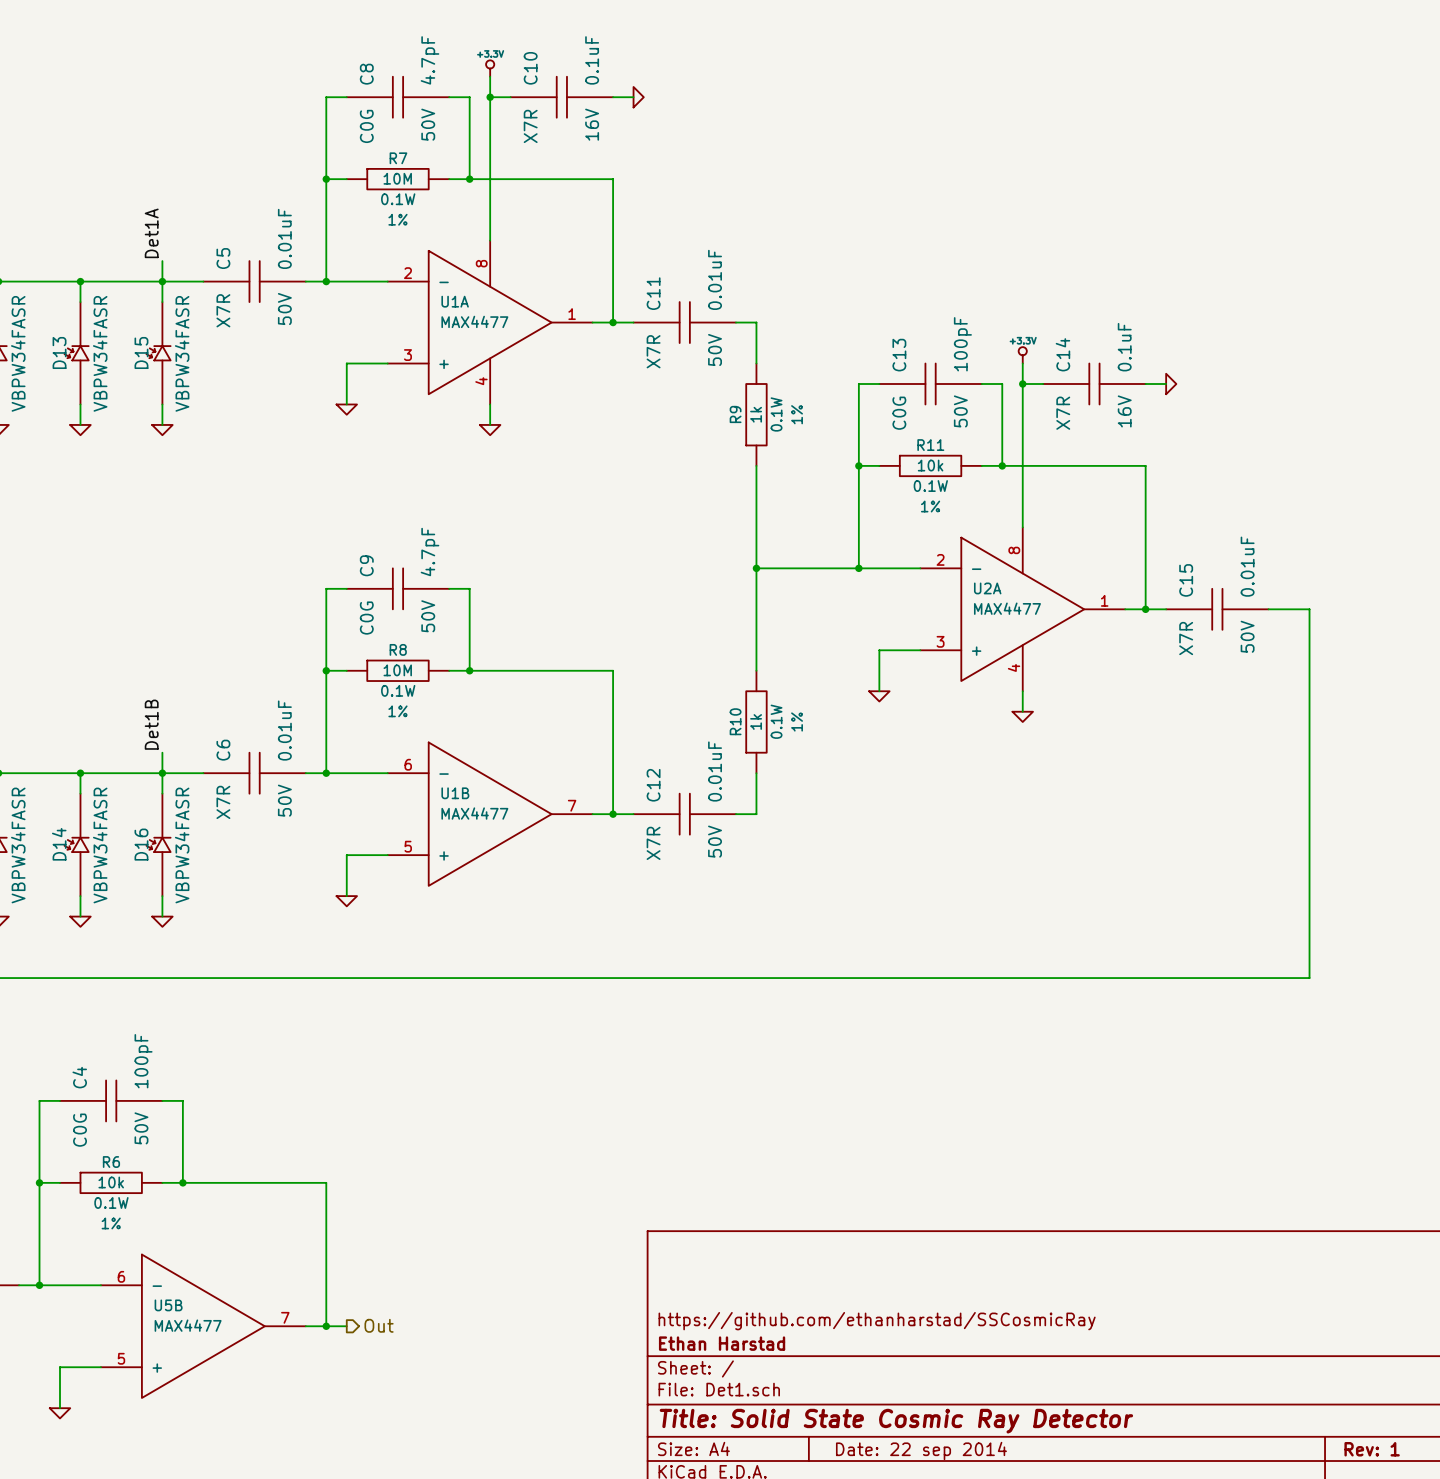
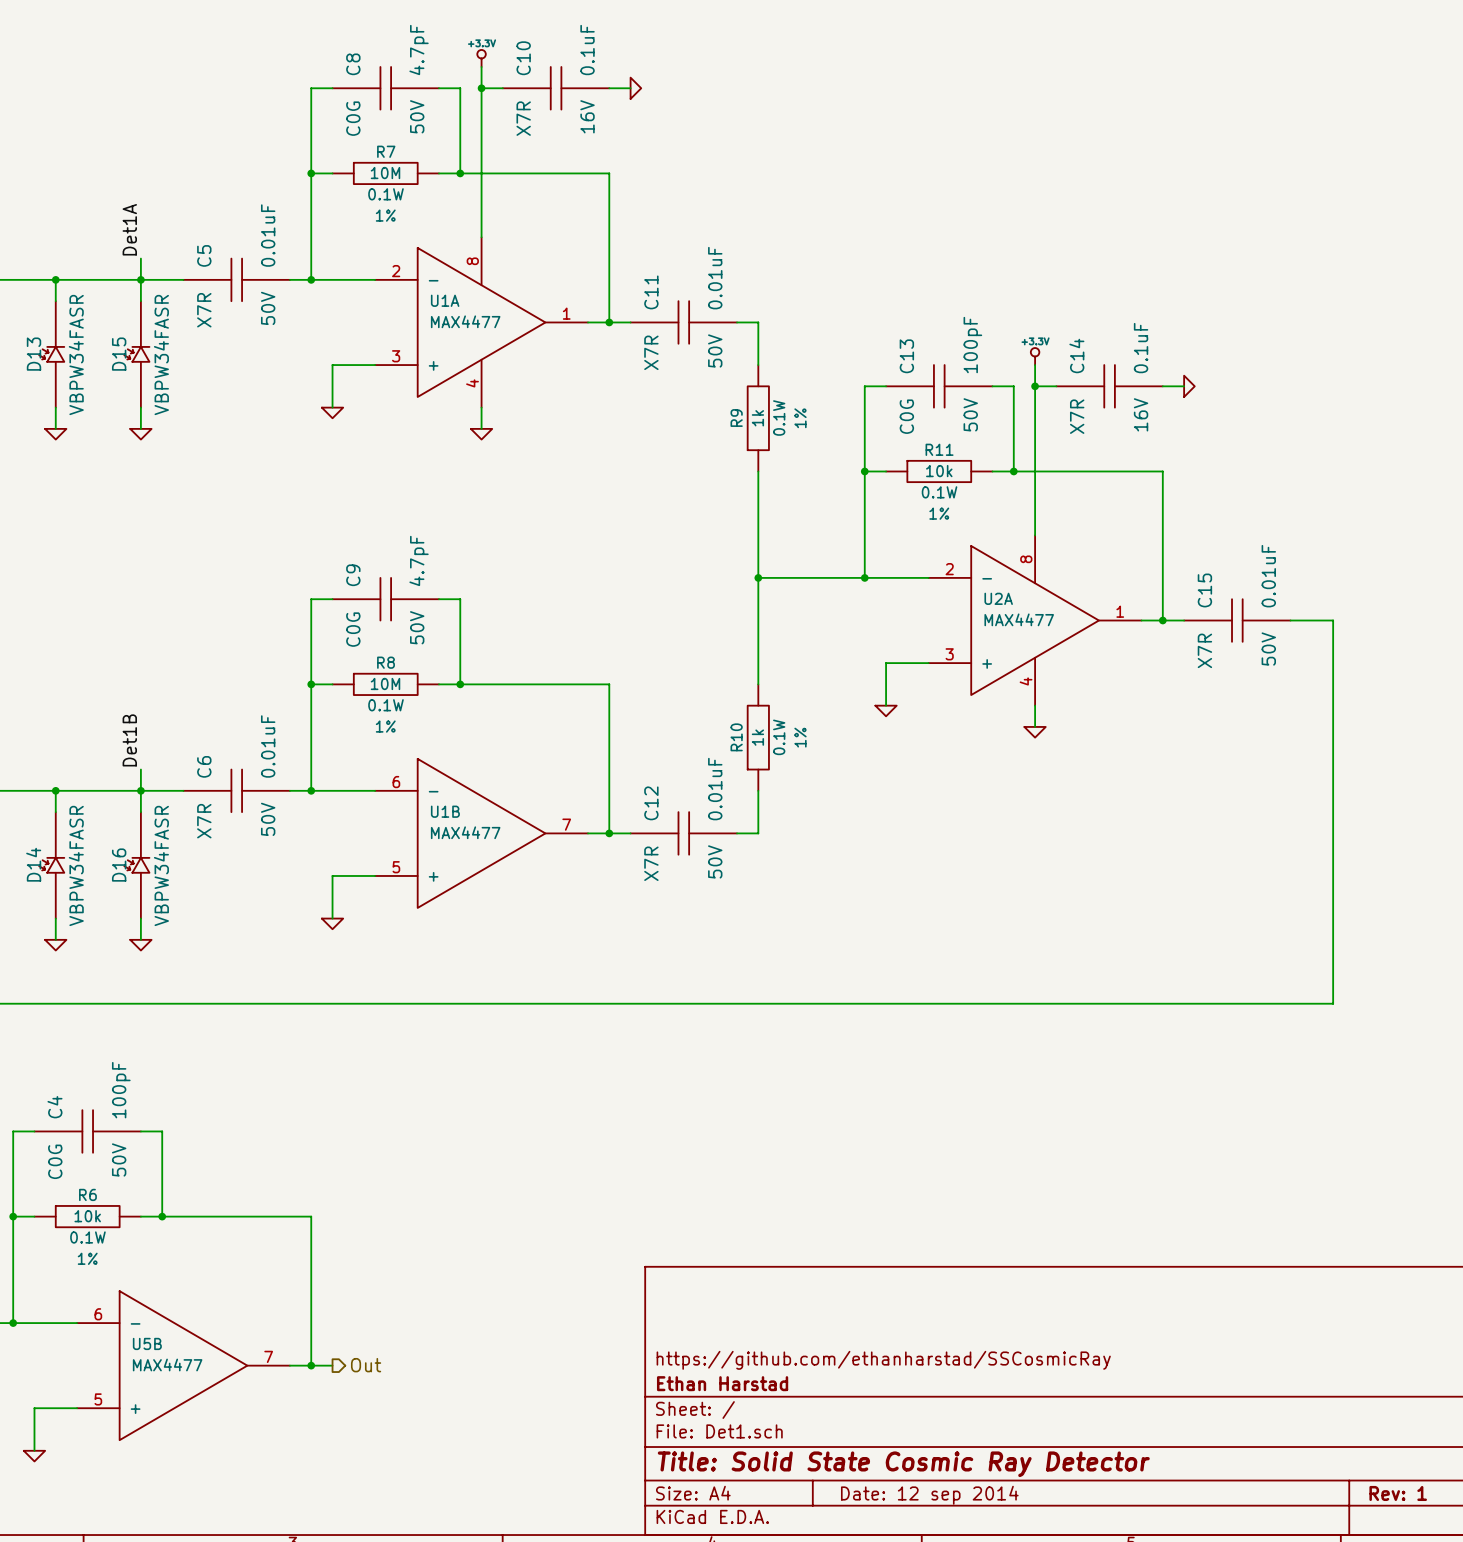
title block: Date: 22 sep 2014 (921, 1450) -> Date: 12 sep 2014 (929, 1495)

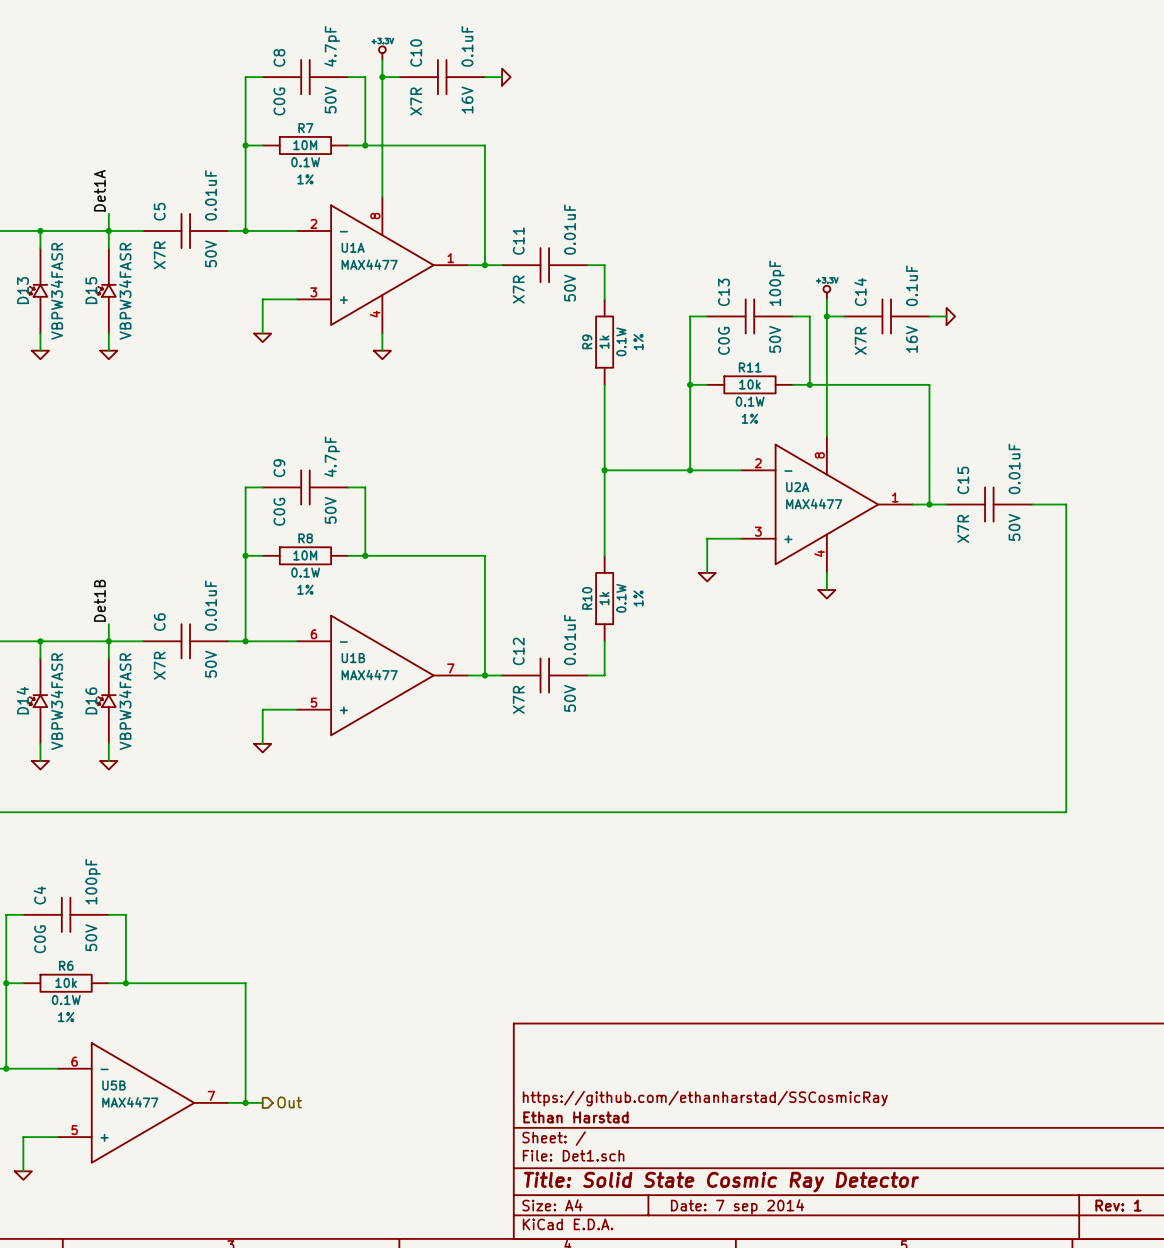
title block: Date: 12 sep 2014 (929, 1495) -> Date: 7 sep 2014 (737, 1207)

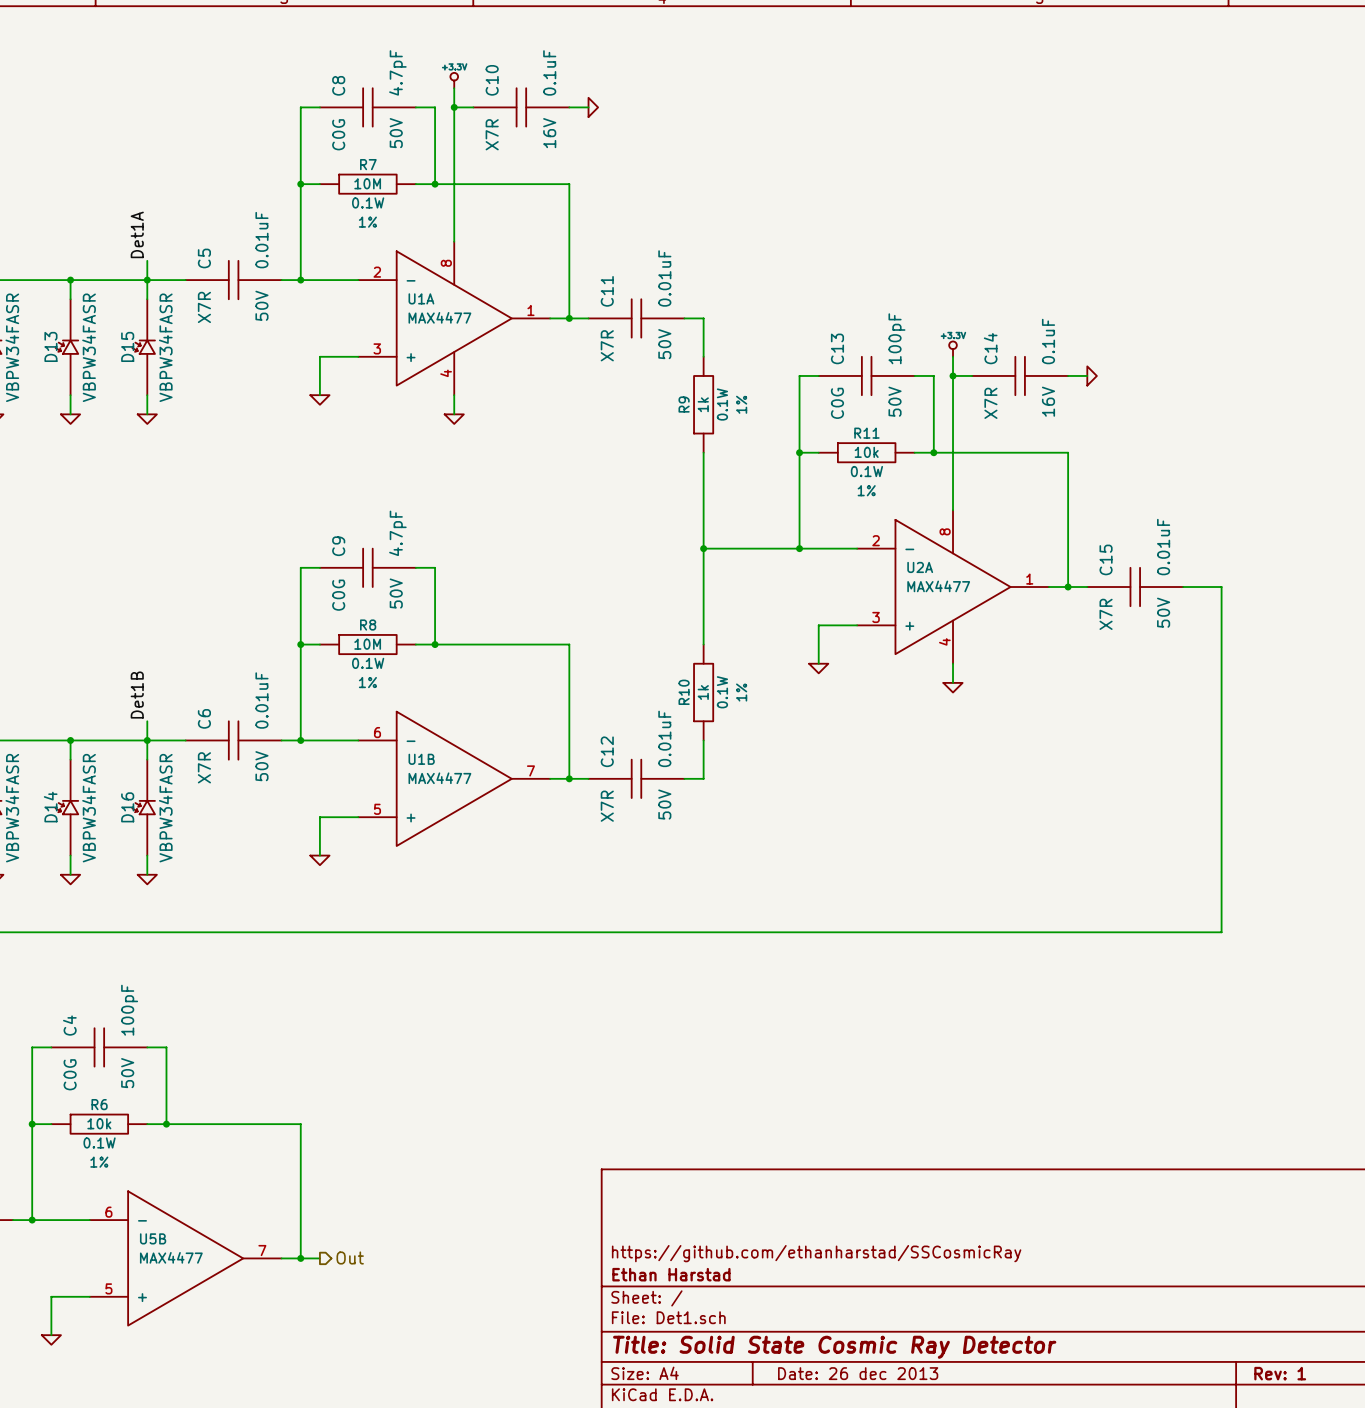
title block: Date: 7 sep 2014 (737, 1207) -> Date: 26 dec 2013 (858, 1373)

